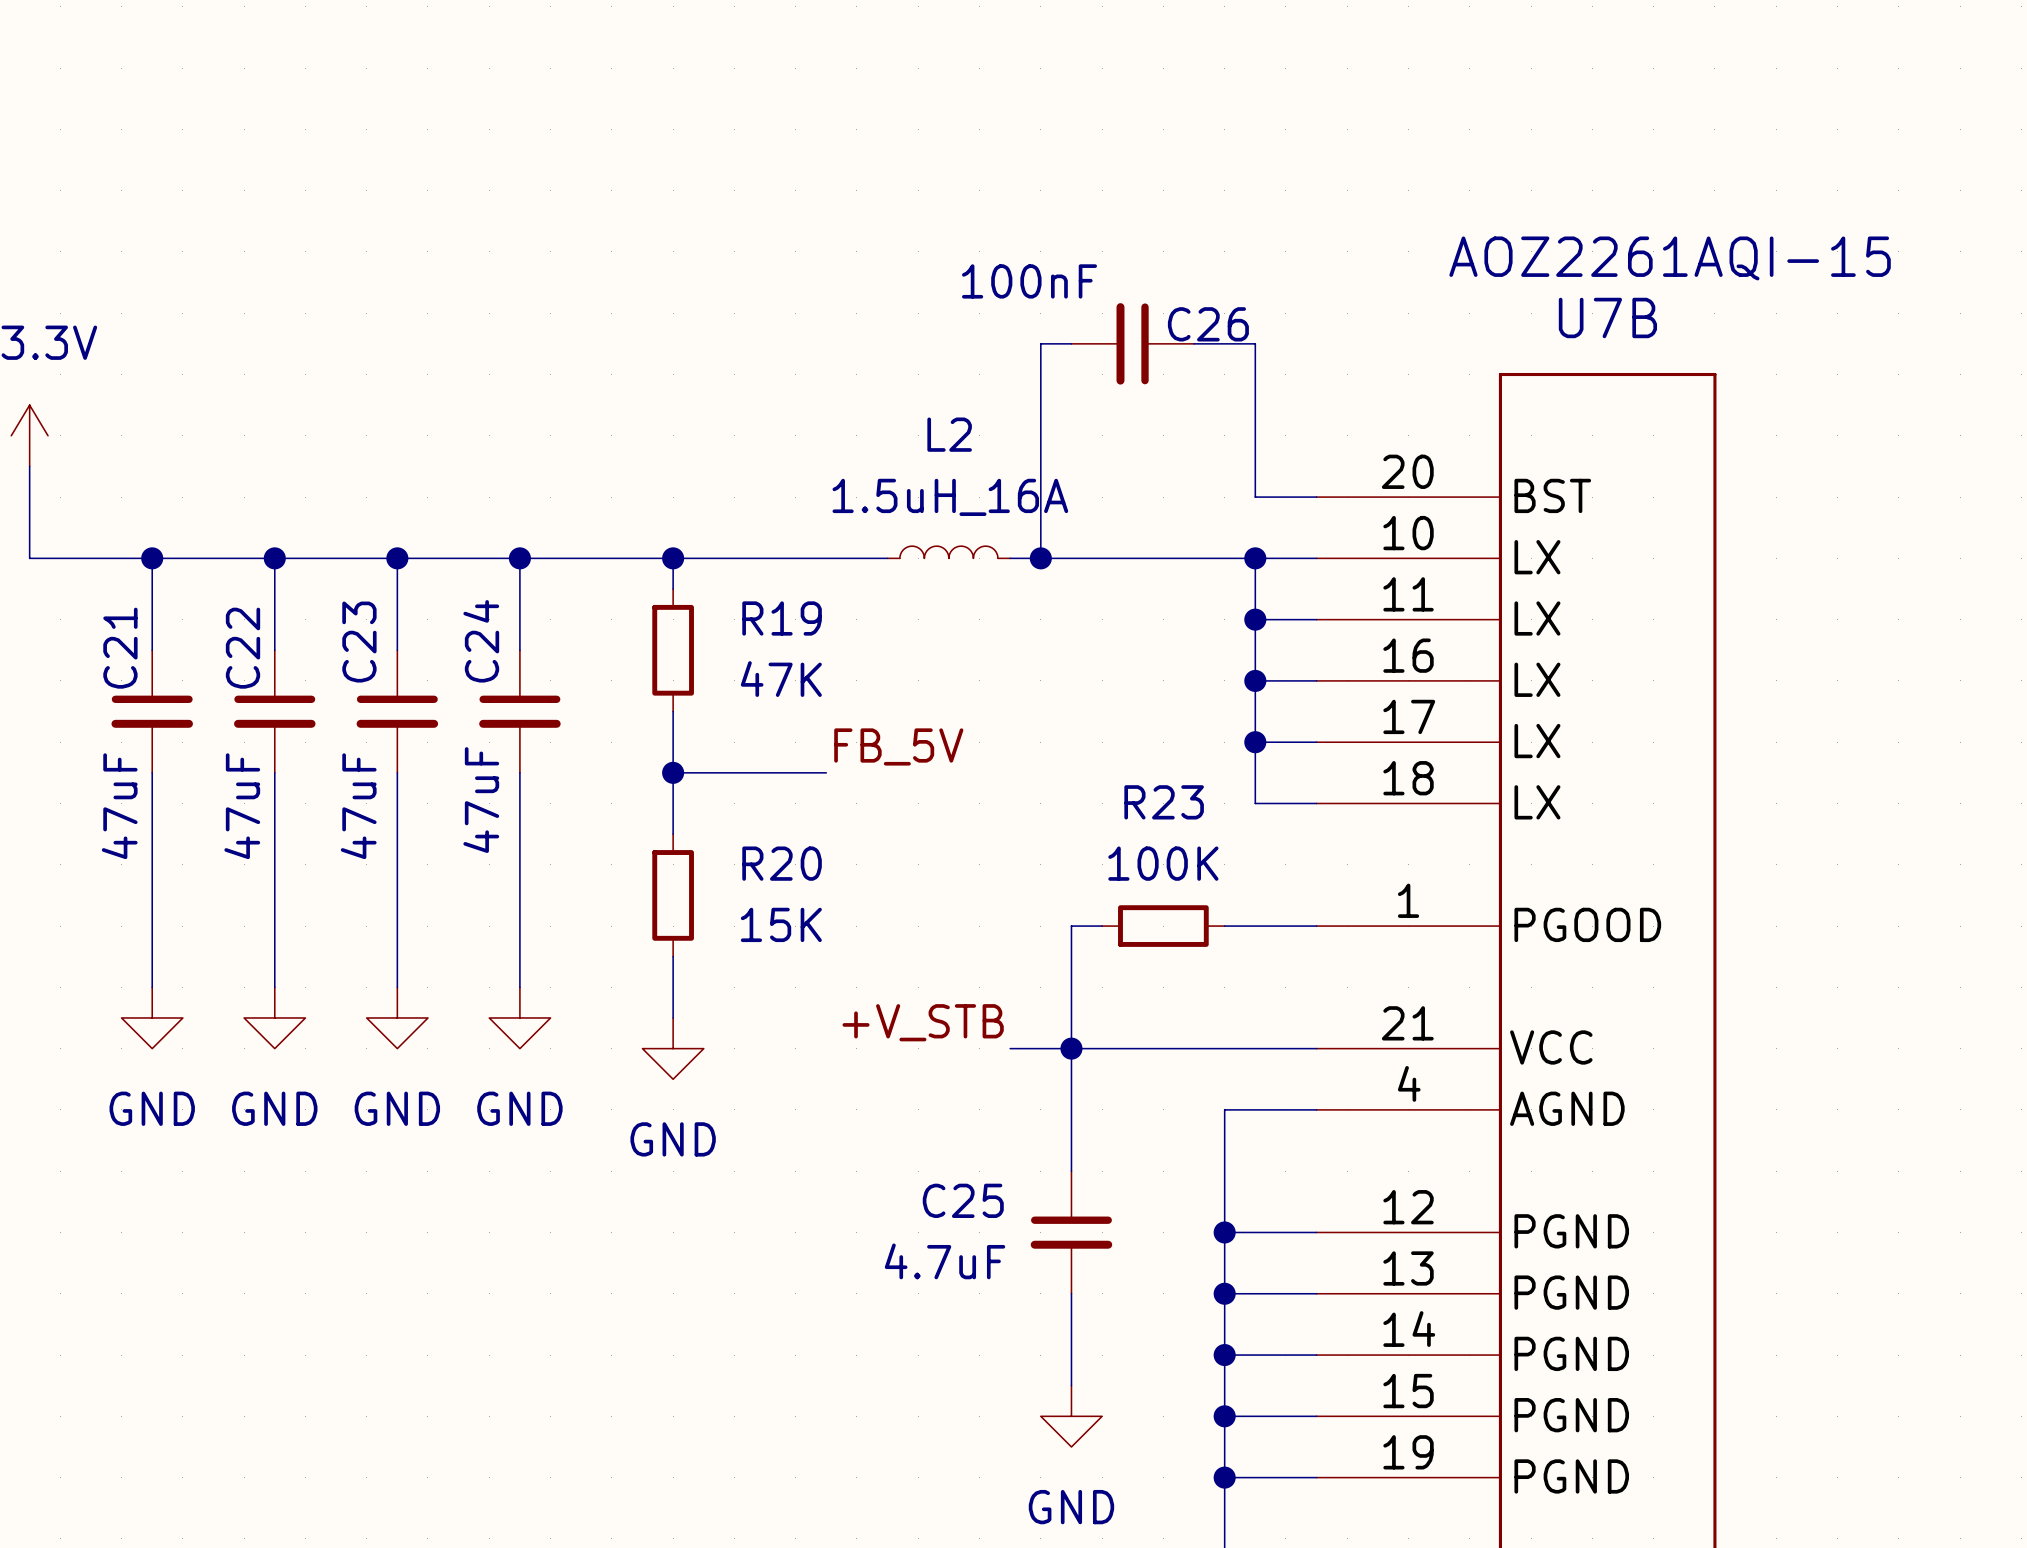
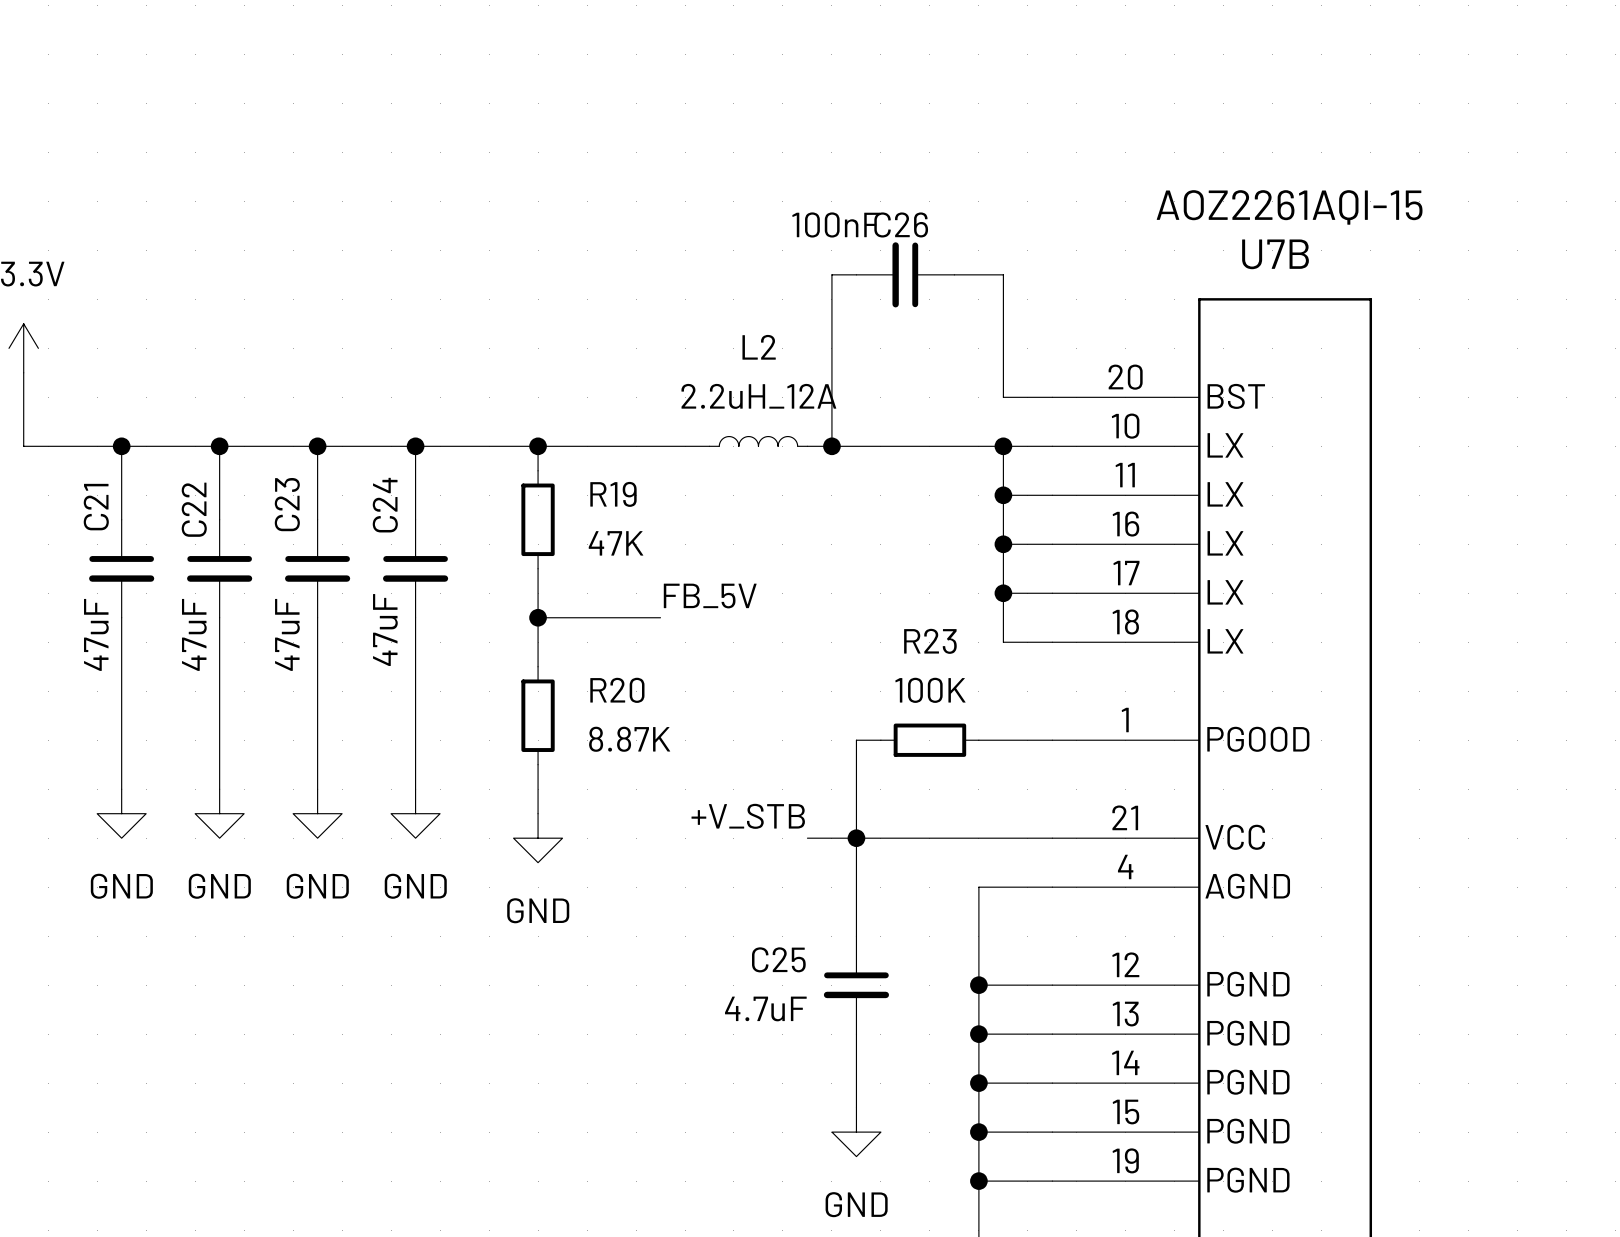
C26 name position: C26 (1208, 324) -> C26 (901, 224)
L2 value: 1.5uH_16A (950, 497) -> 2.2uH_12A (758, 396)
R20 value: 15K (781, 924) -> 8.87K (629, 739)

